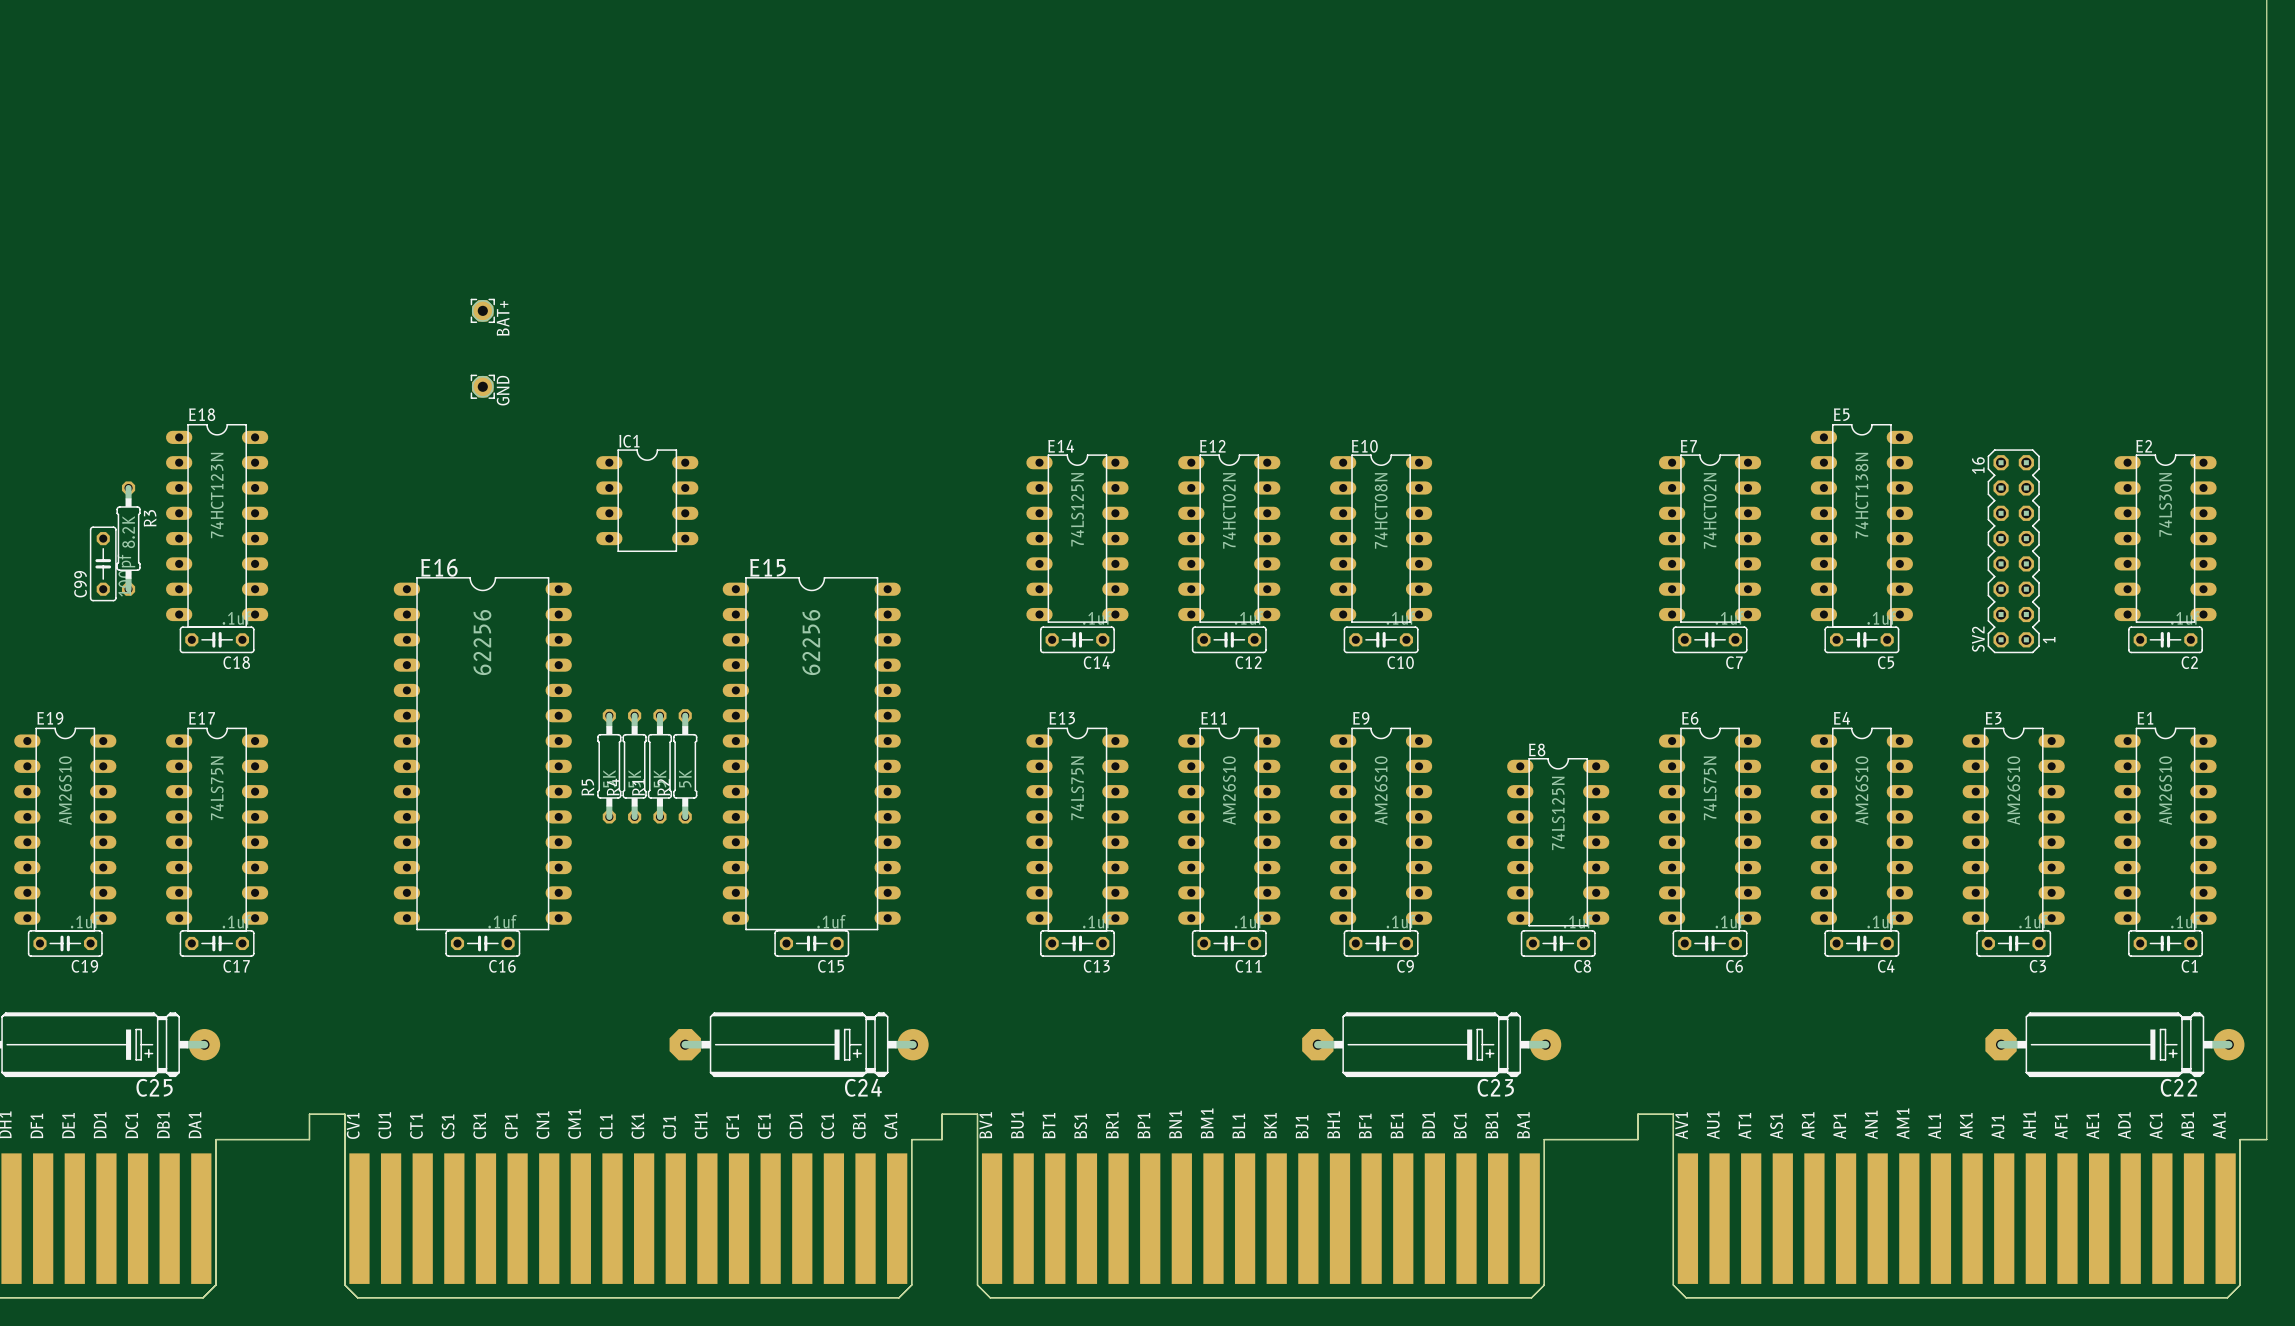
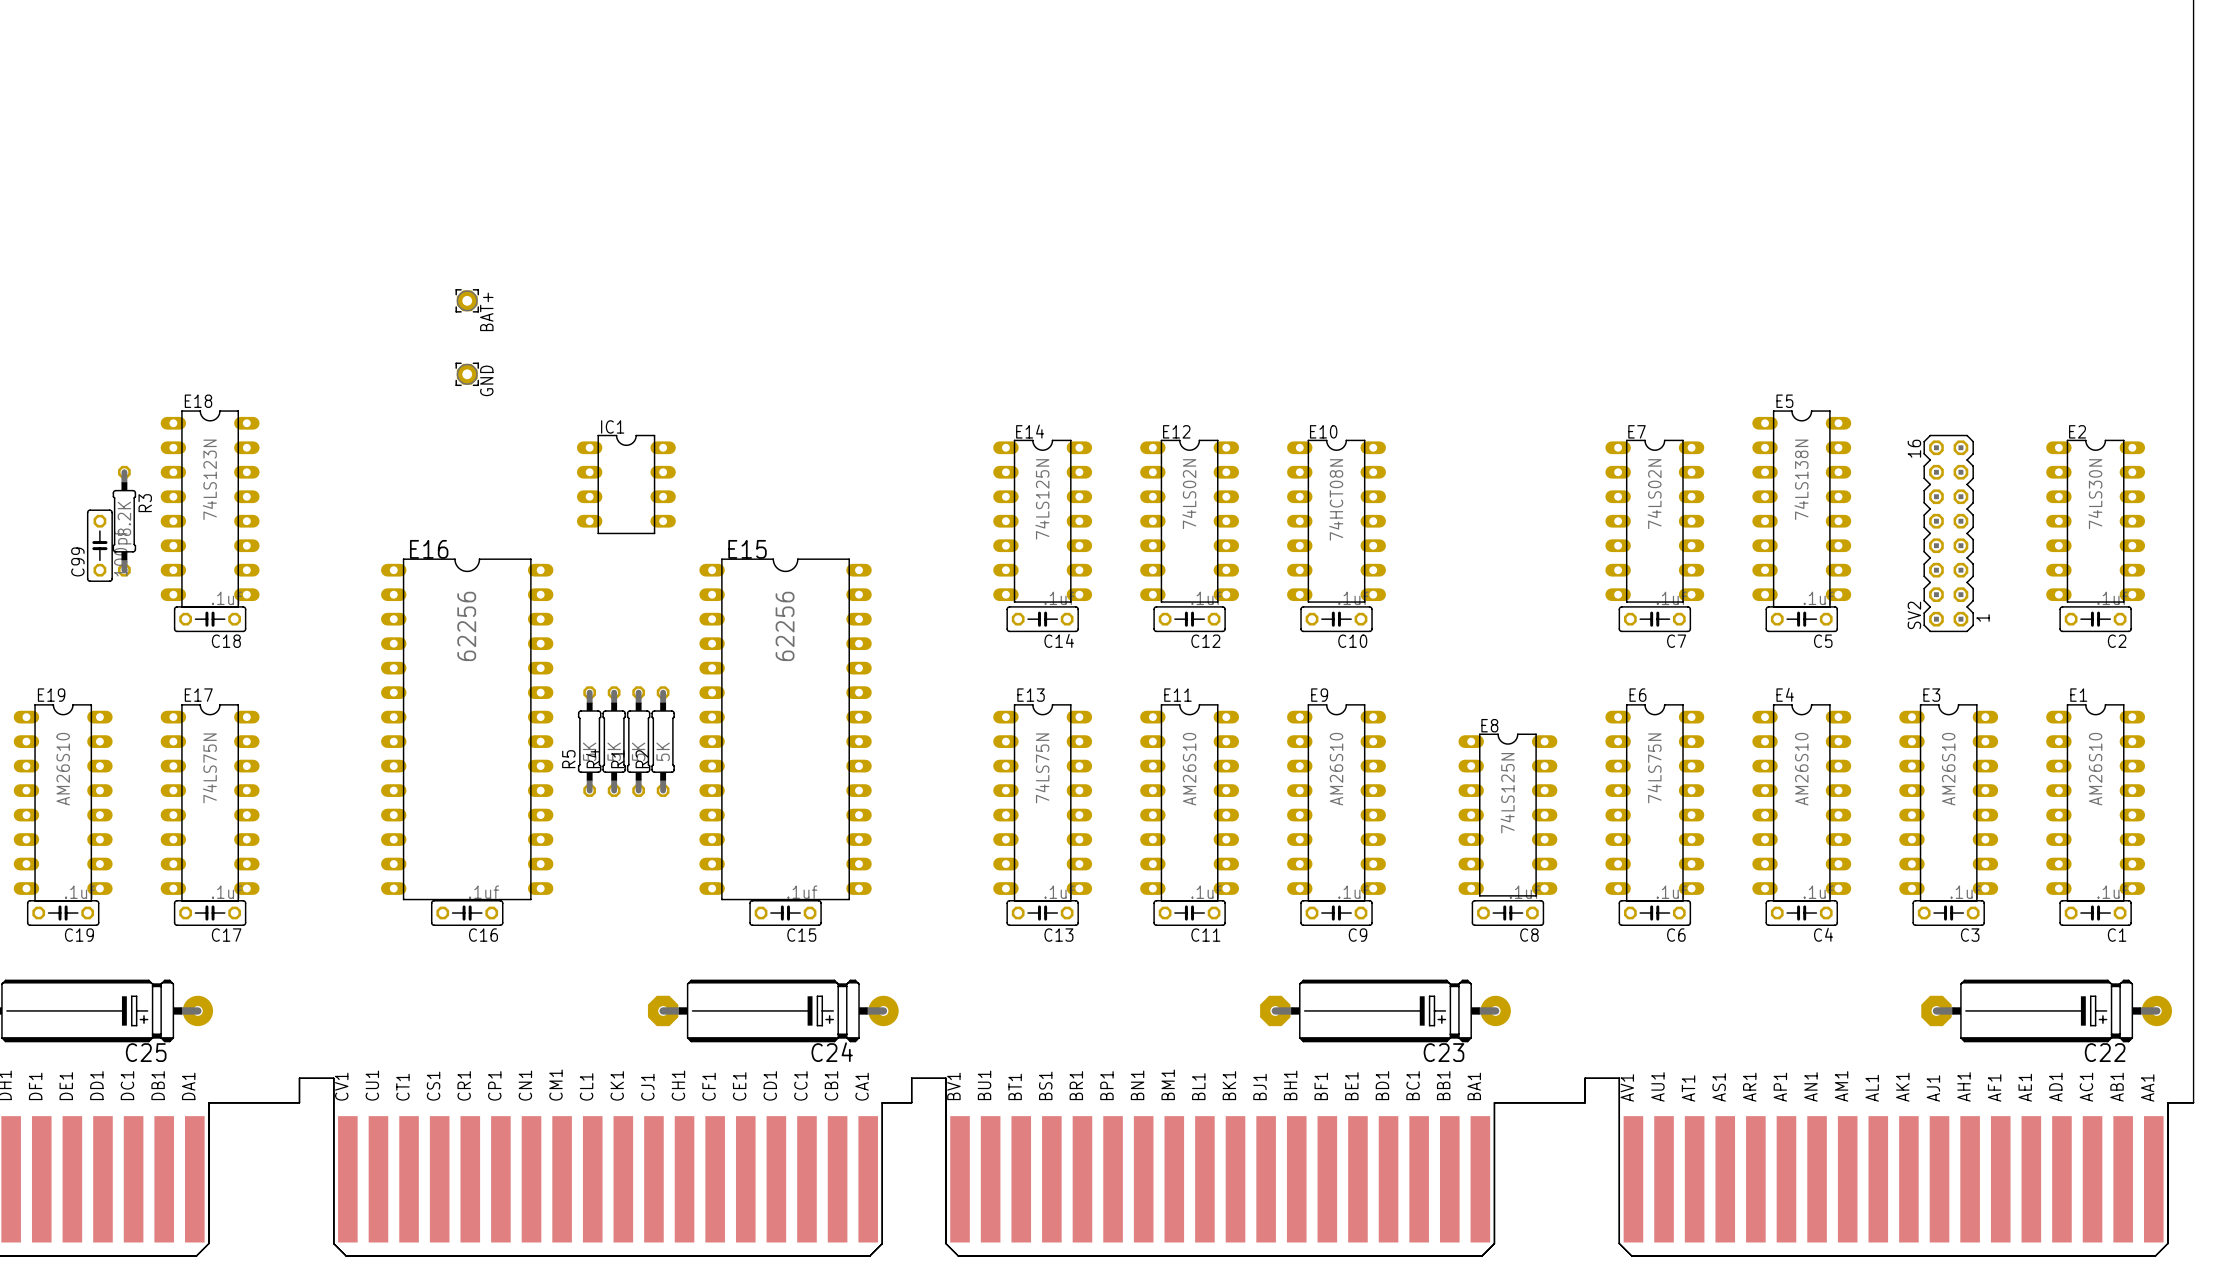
E18 value: 74HCT123N (217, 495) -> 74LS123N (209, 479)
E5 value: 74HCT138N (1861, 495) -> 74LS138N (1801, 479)
E12 value: 74HCT02N (1229, 510) -> 74LS02N (1189, 494)
E7 value: 74HCT02N (1710, 510) -> 74LS02N (1654, 494)

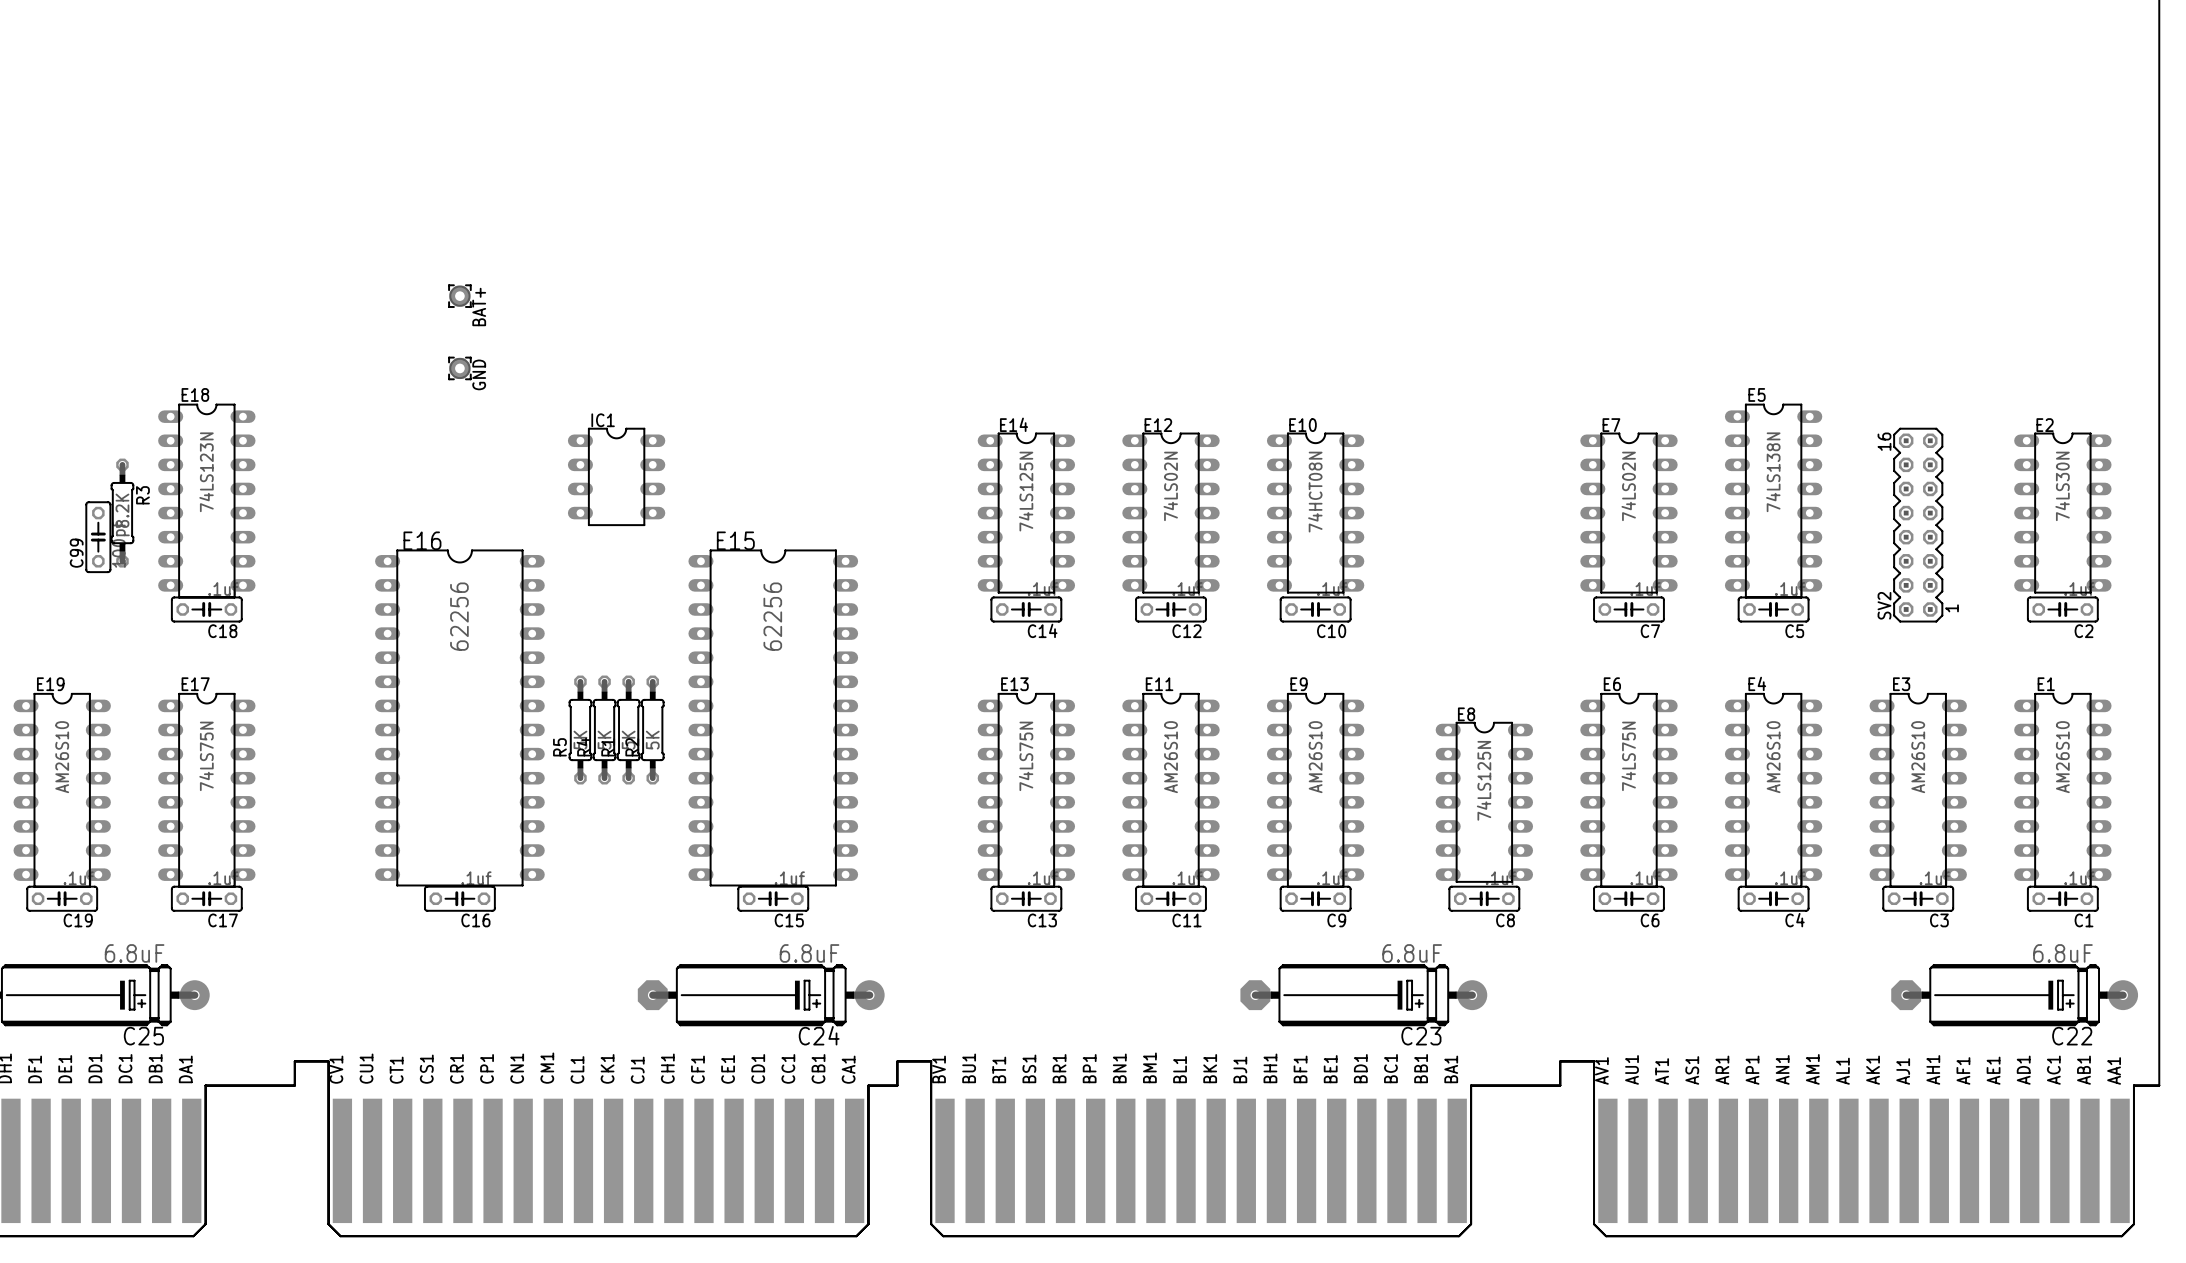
C25 value: none -> 6.8uF (134, 953)
C24 value: none -> 6.8uF (809, 953)
C23 value: none -> 6.8uF (1412, 953)
C22 value: none -> 6.8uF (2062, 953)

